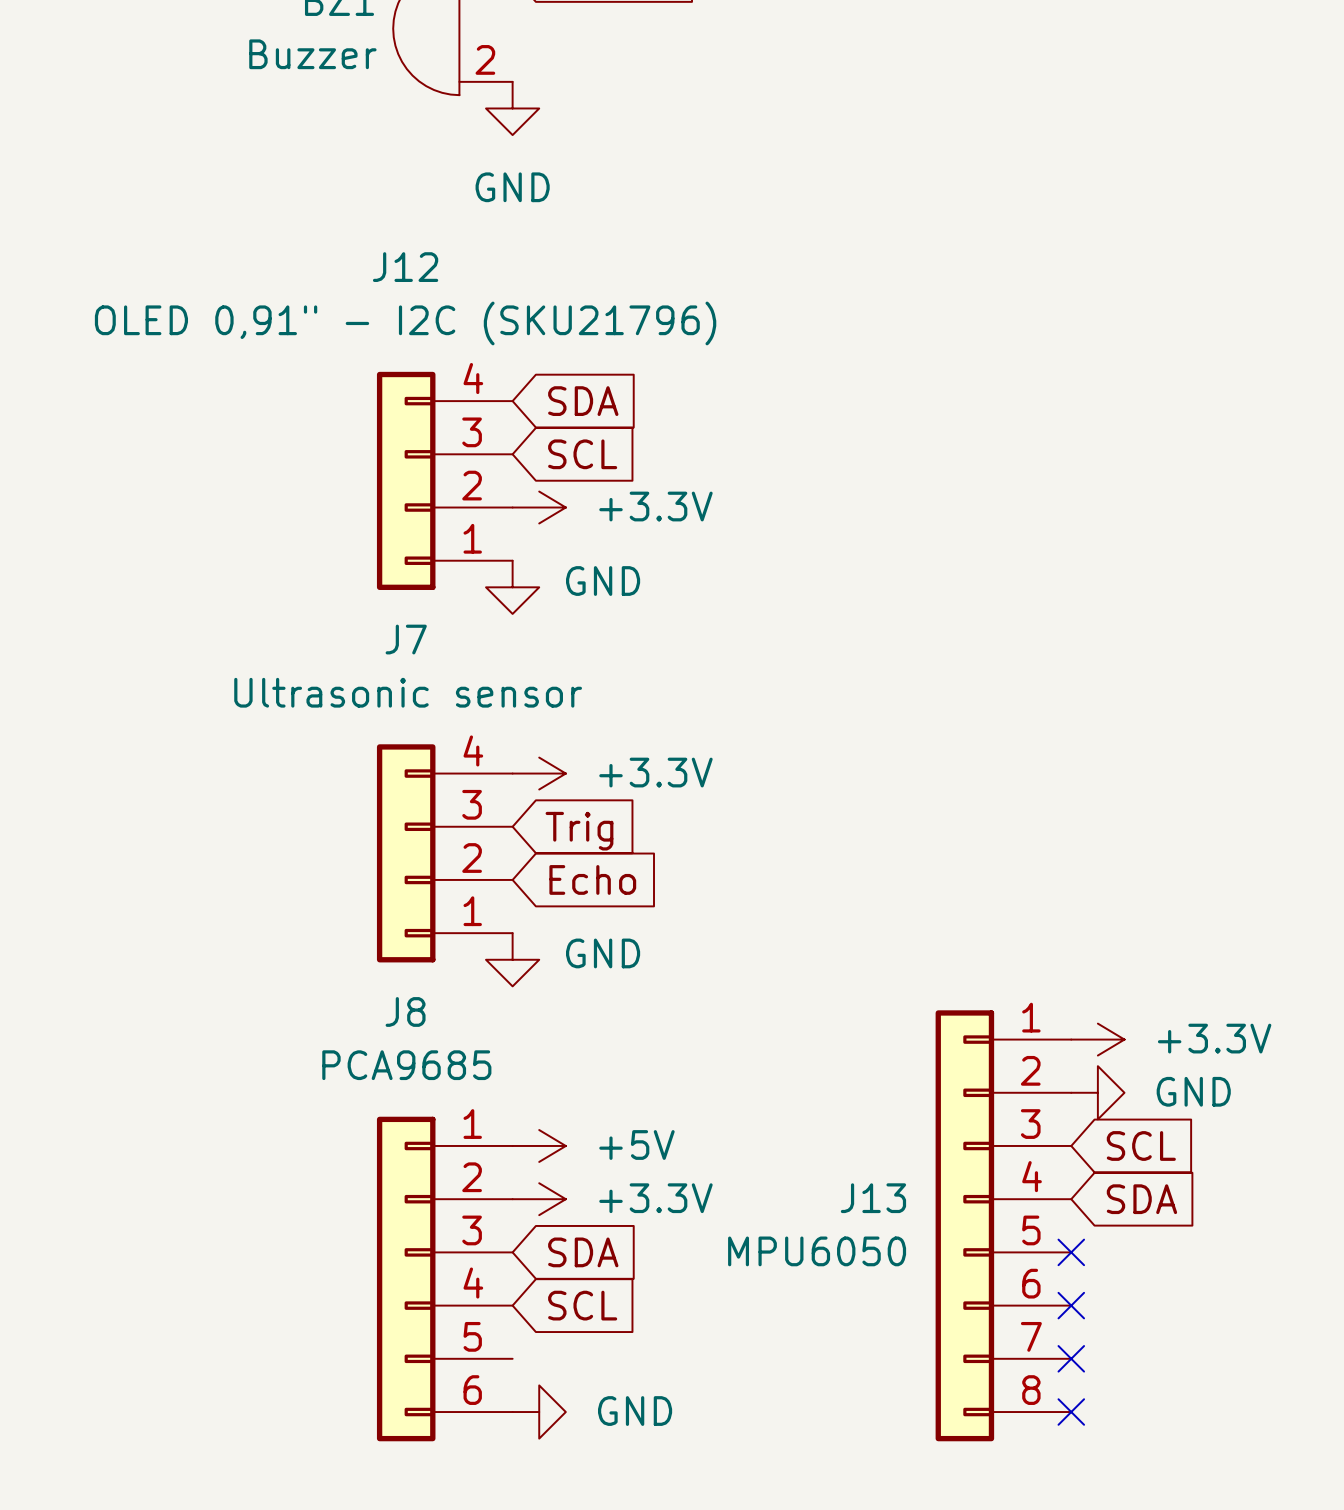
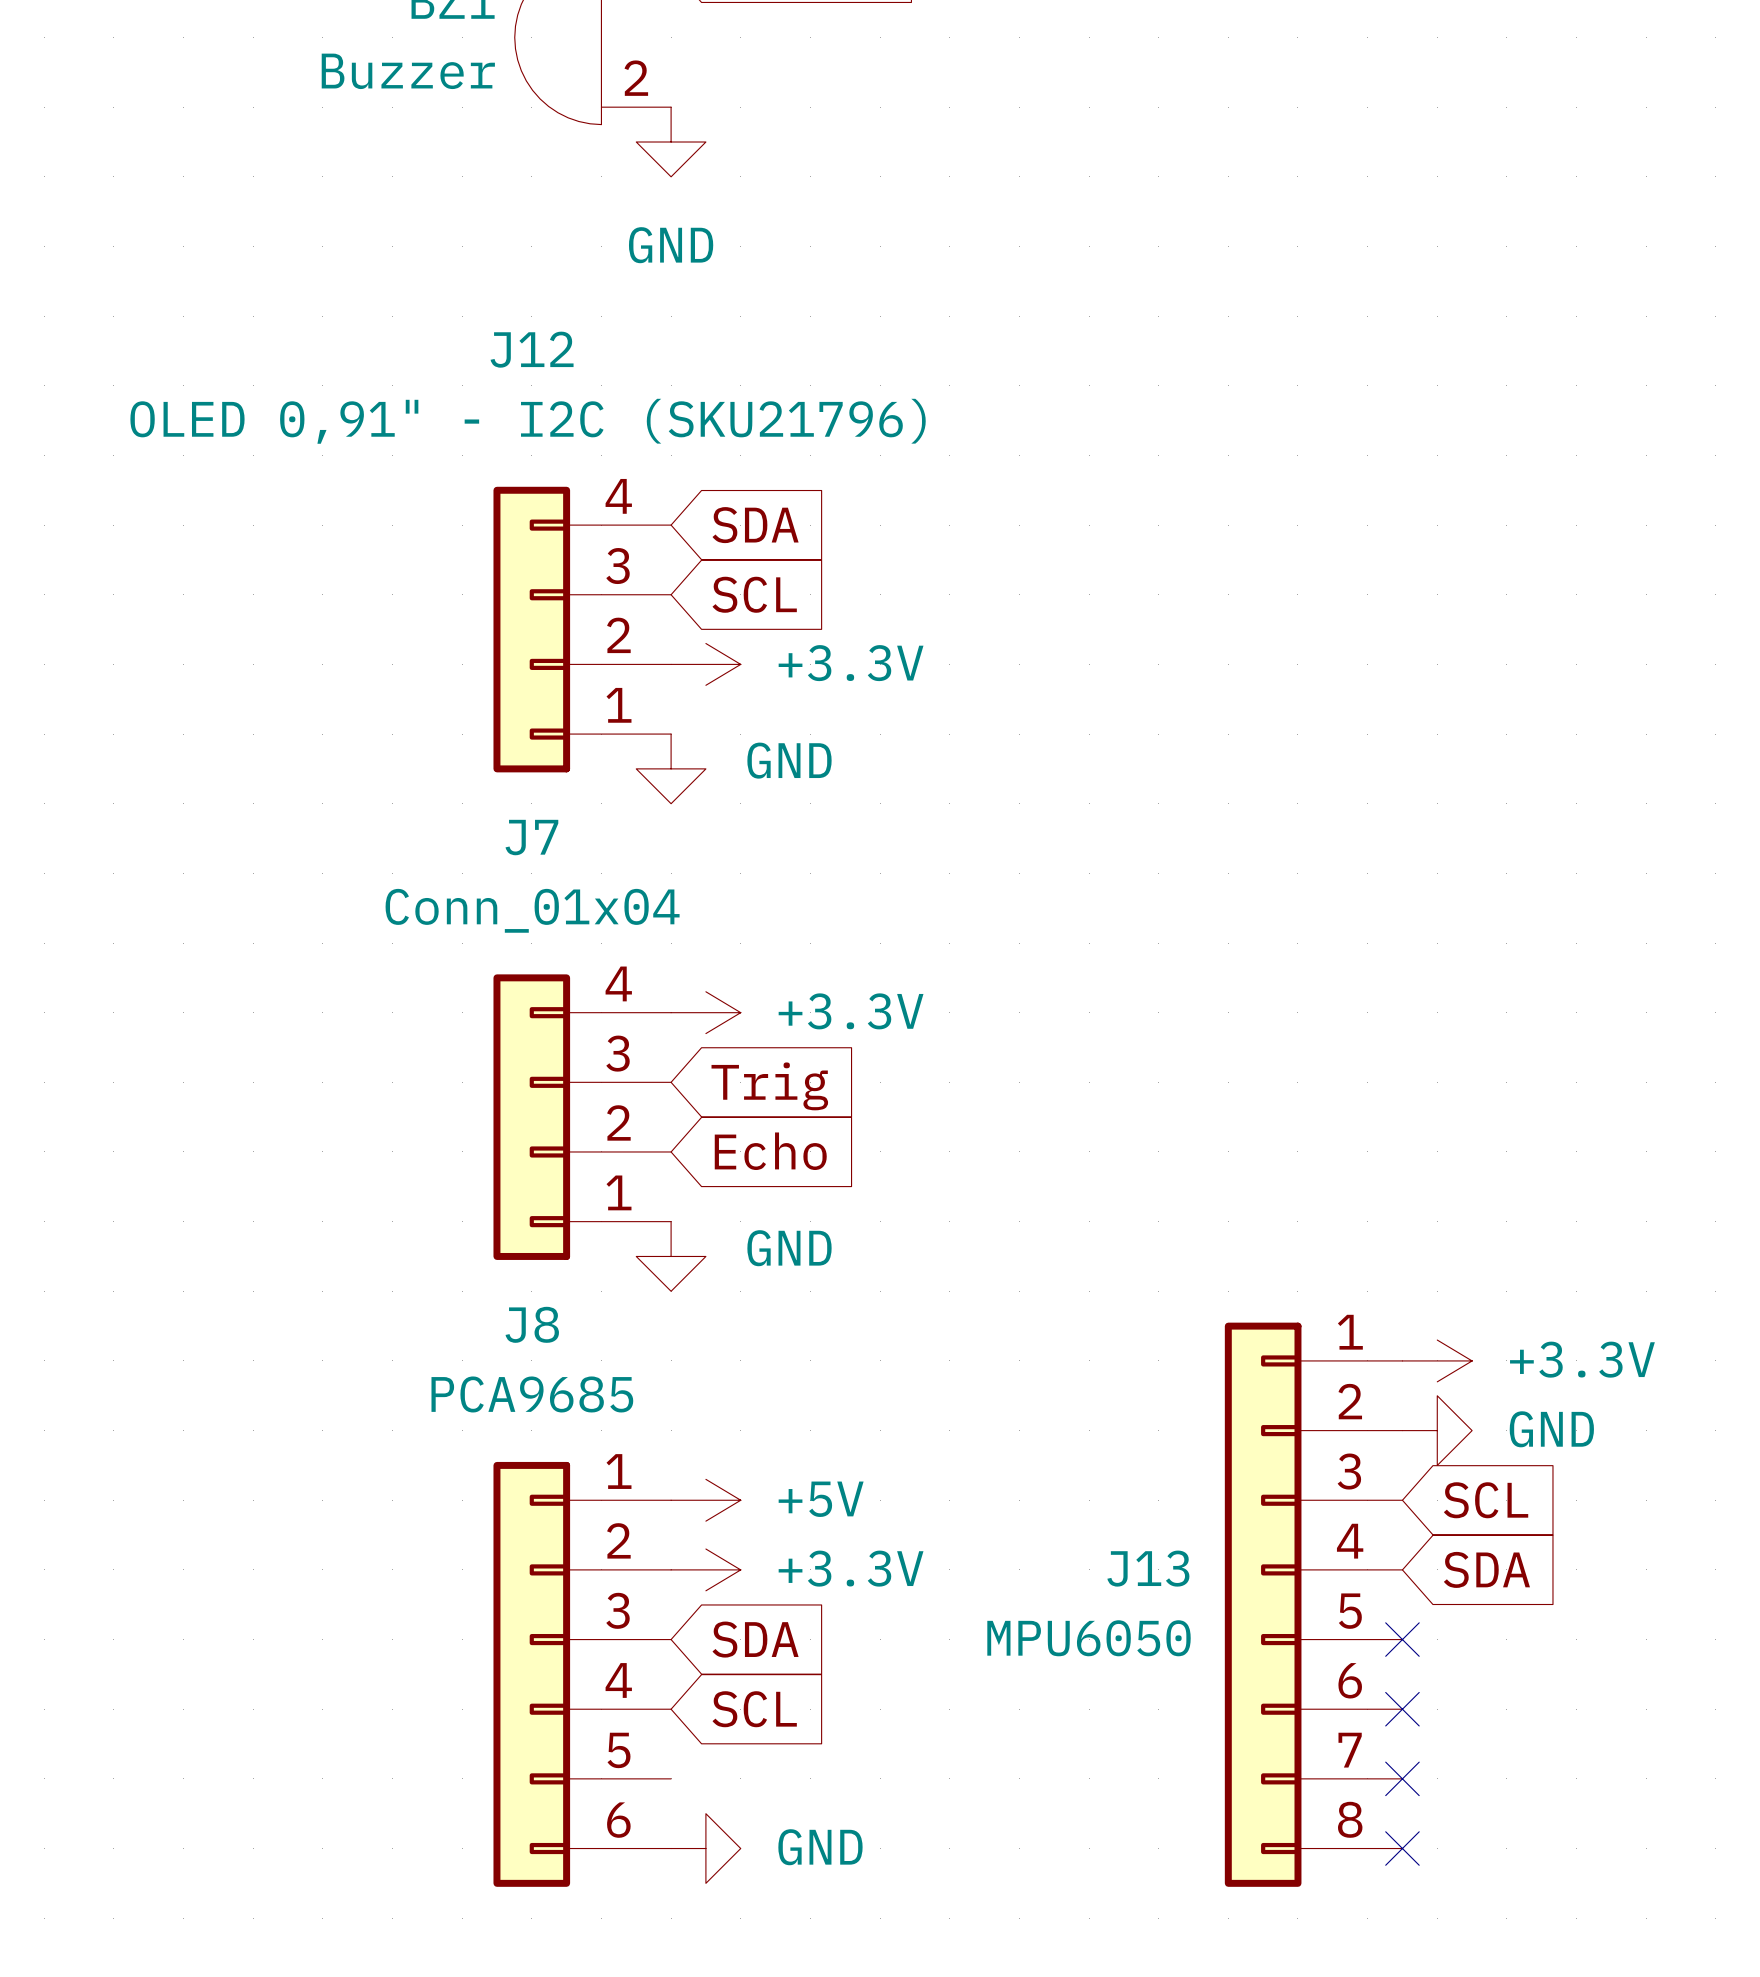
J7 value: Ultrasonic sensor (408, 692) -> Conn_01x04 (532, 910)

